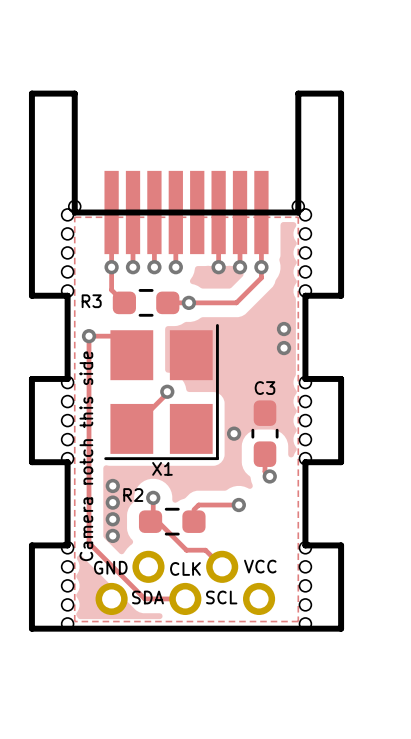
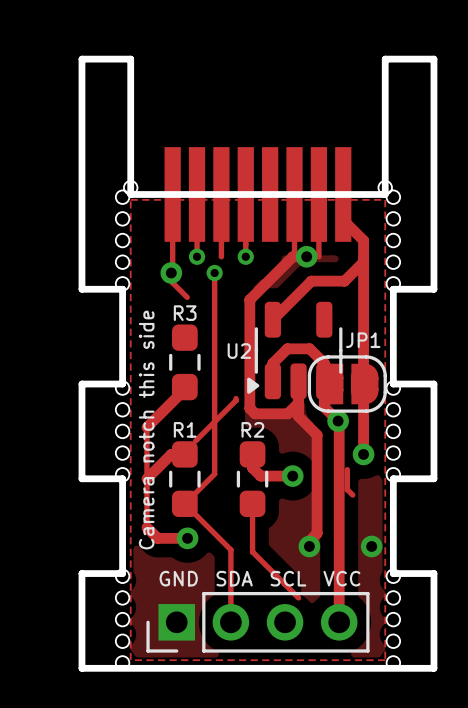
track: (261, 212) (261, 277) (236, 302) (167, 302) -> none
track: none -> (343, 220) (363, 240) (363, 454)
via position: (111, 267) -> (171, 273)
via position: (154, 267) -> (214, 273)
via: (218, 267) -> none
track: none -> (306, 256) (292, 256) (249, 299) (249, 408) (255, 413) (287, 413) (298, 402)
via: none -> (306, 256)
via: (240, 267) -> none
via: (261, 267) -> none
track: none -> (363, 262) (344, 281) (311, 281) (272, 319)
track: none -> (214, 273) (214, 474) (184, 503) (230, 549) (230, 622)
R3 rotation: 0° (146, 302) -> 90° clockwise (184, 362)
R3 position: (146, 302) -> (184, 362)
via: (188, 302) -> none
via: (284, 329) -> none
via: (89, 336) -> none
via: (284, 348) -> none
U2: none -> (294, 350)
track: (131, 355) (112, 336) (89, 336) (89, 417) -> (184, 389) (146, 427)
track: none -> (272, 381) (272, 363) (287, 348) (309, 348) (324, 363) (324, 407) (339, 422) (339, 622)
track: none -> (298, 381) (298, 416) (317, 435) (317, 533) (312, 538)
JP1: none -> (347, 384)
via: (167, 391) -> none
X1: (161, 392) -> none
via: none -> (338, 421)
via: (234, 433) -> none
C3: (265, 433) -> none
track: none -> (184, 454) (171, 454) (146, 478)
track: none -> (252, 454) (252, 467) (260, 476) (292, 476)
via: none -> (363, 454)
text position: Camera notch this side (86, 456) -> Camera notch this side (146, 430)
via: none -> (292, 476)
R1: none -> (184, 479)
via: (269, 476) -> none
via: (112, 485) -> none
track: (153, 497) (153, 518) (150, 521) (157, 521) (186, 550) (205, 550) -> (252, 503) (252, 551) (279, 578)
via: (153, 497) -> none
via: (112, 502) -> none
track: (89, 505) (89, 543) (144, 598) (185, 598) -> (146, 527) (157, 538) (187, 538)
track: (238, 505) (198, 505) (193, 509) -> none
via position: (238, 505) -> (309, 546)
via: none -> (187, 538)
via: (112, 519) -> none
R2 rotation: 0° (172, 521) -> 90° clockwise (252, 479)
R2 position: (172, 521) -> (252, 479)
via: none -> (371, 546)
via: (112, 535) -> none
part footprint: [95, 550, 276, 616] -> [146, 591, 370, 653]
text position: VCC (260, 566) -> VCC (341, 578)
text position: GND (110, 567) -> GND (178, 578)
text: CLK (185, 568) -> none
text position: SDA (147, 597) -> SDA (234, 578)
text position: SCL (221, 597) -> SCL (288, 578)

